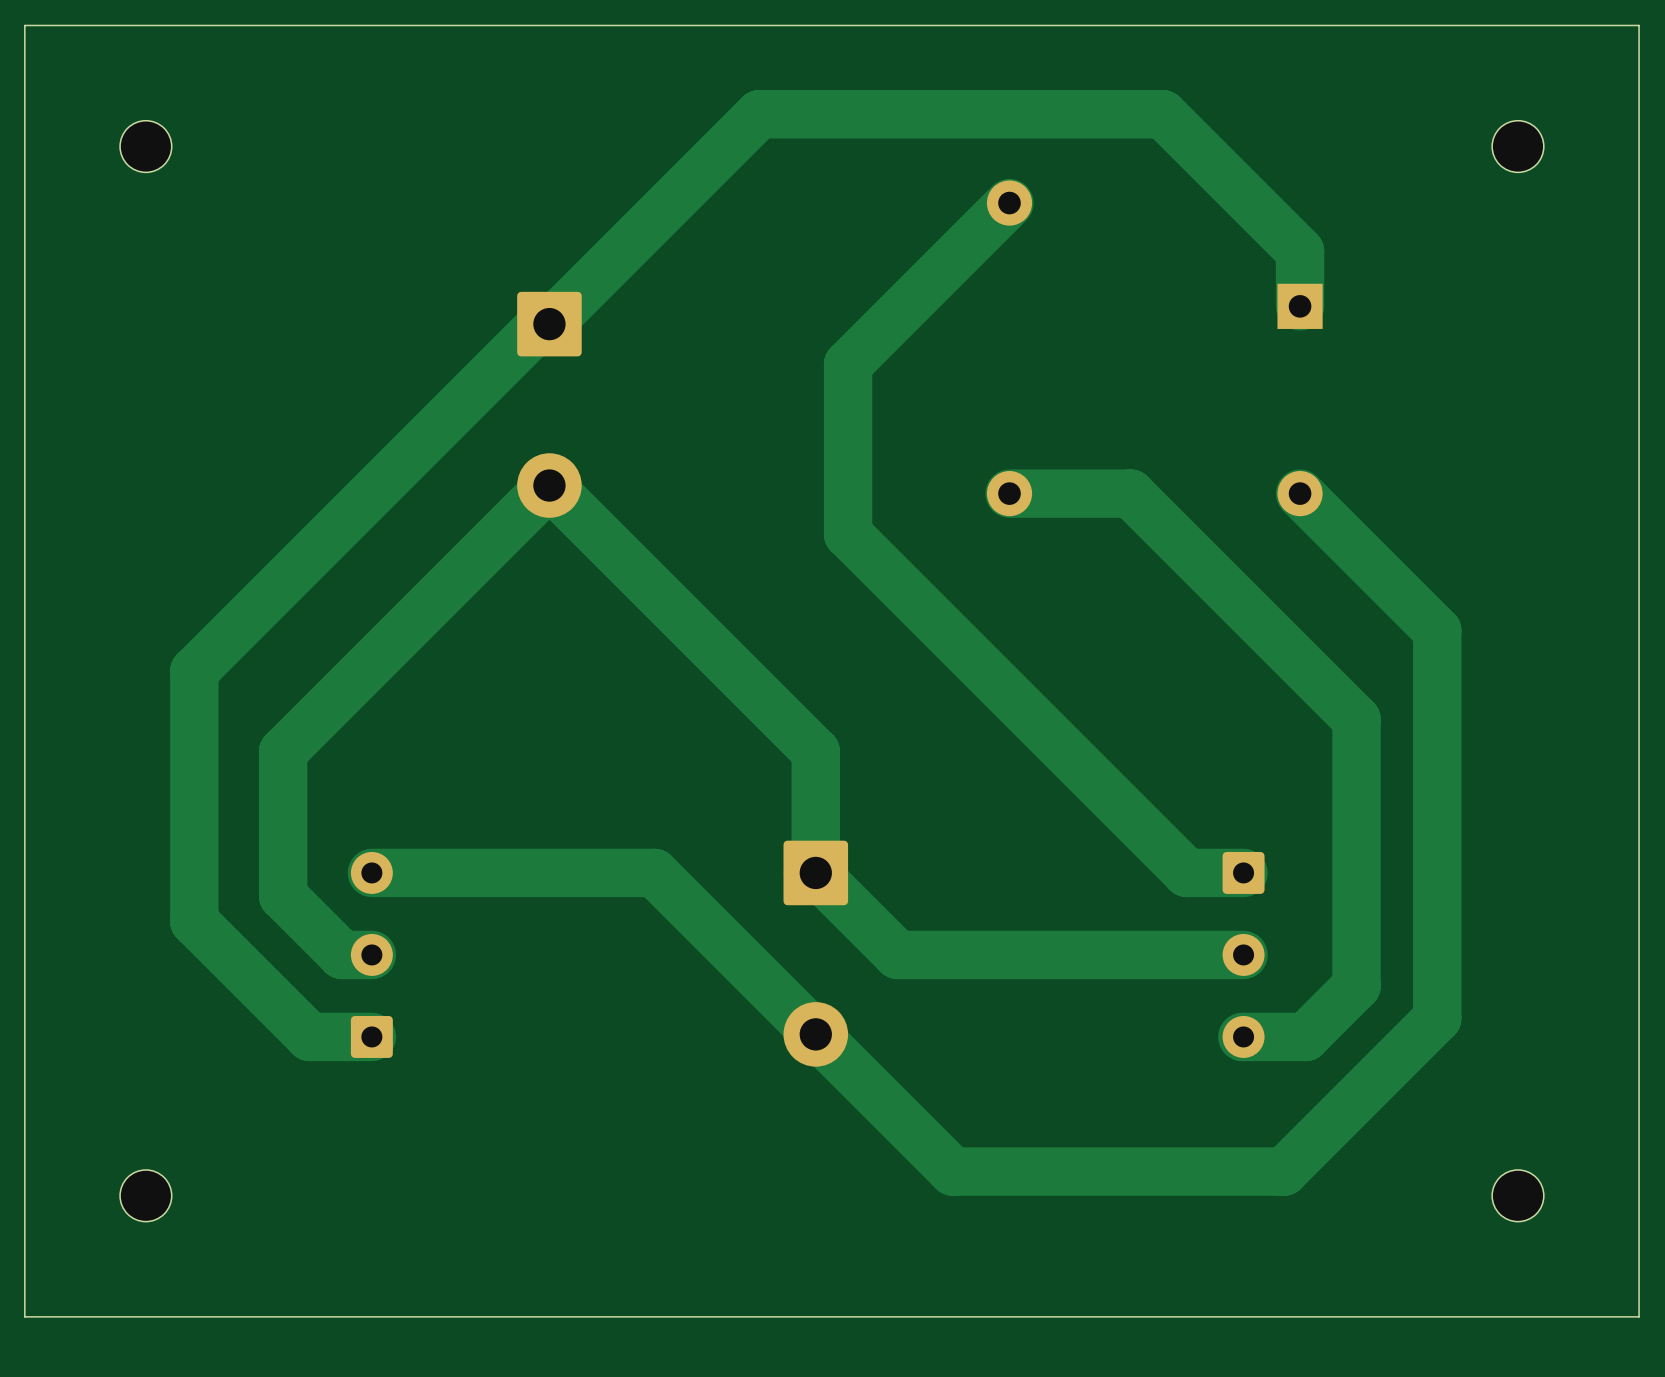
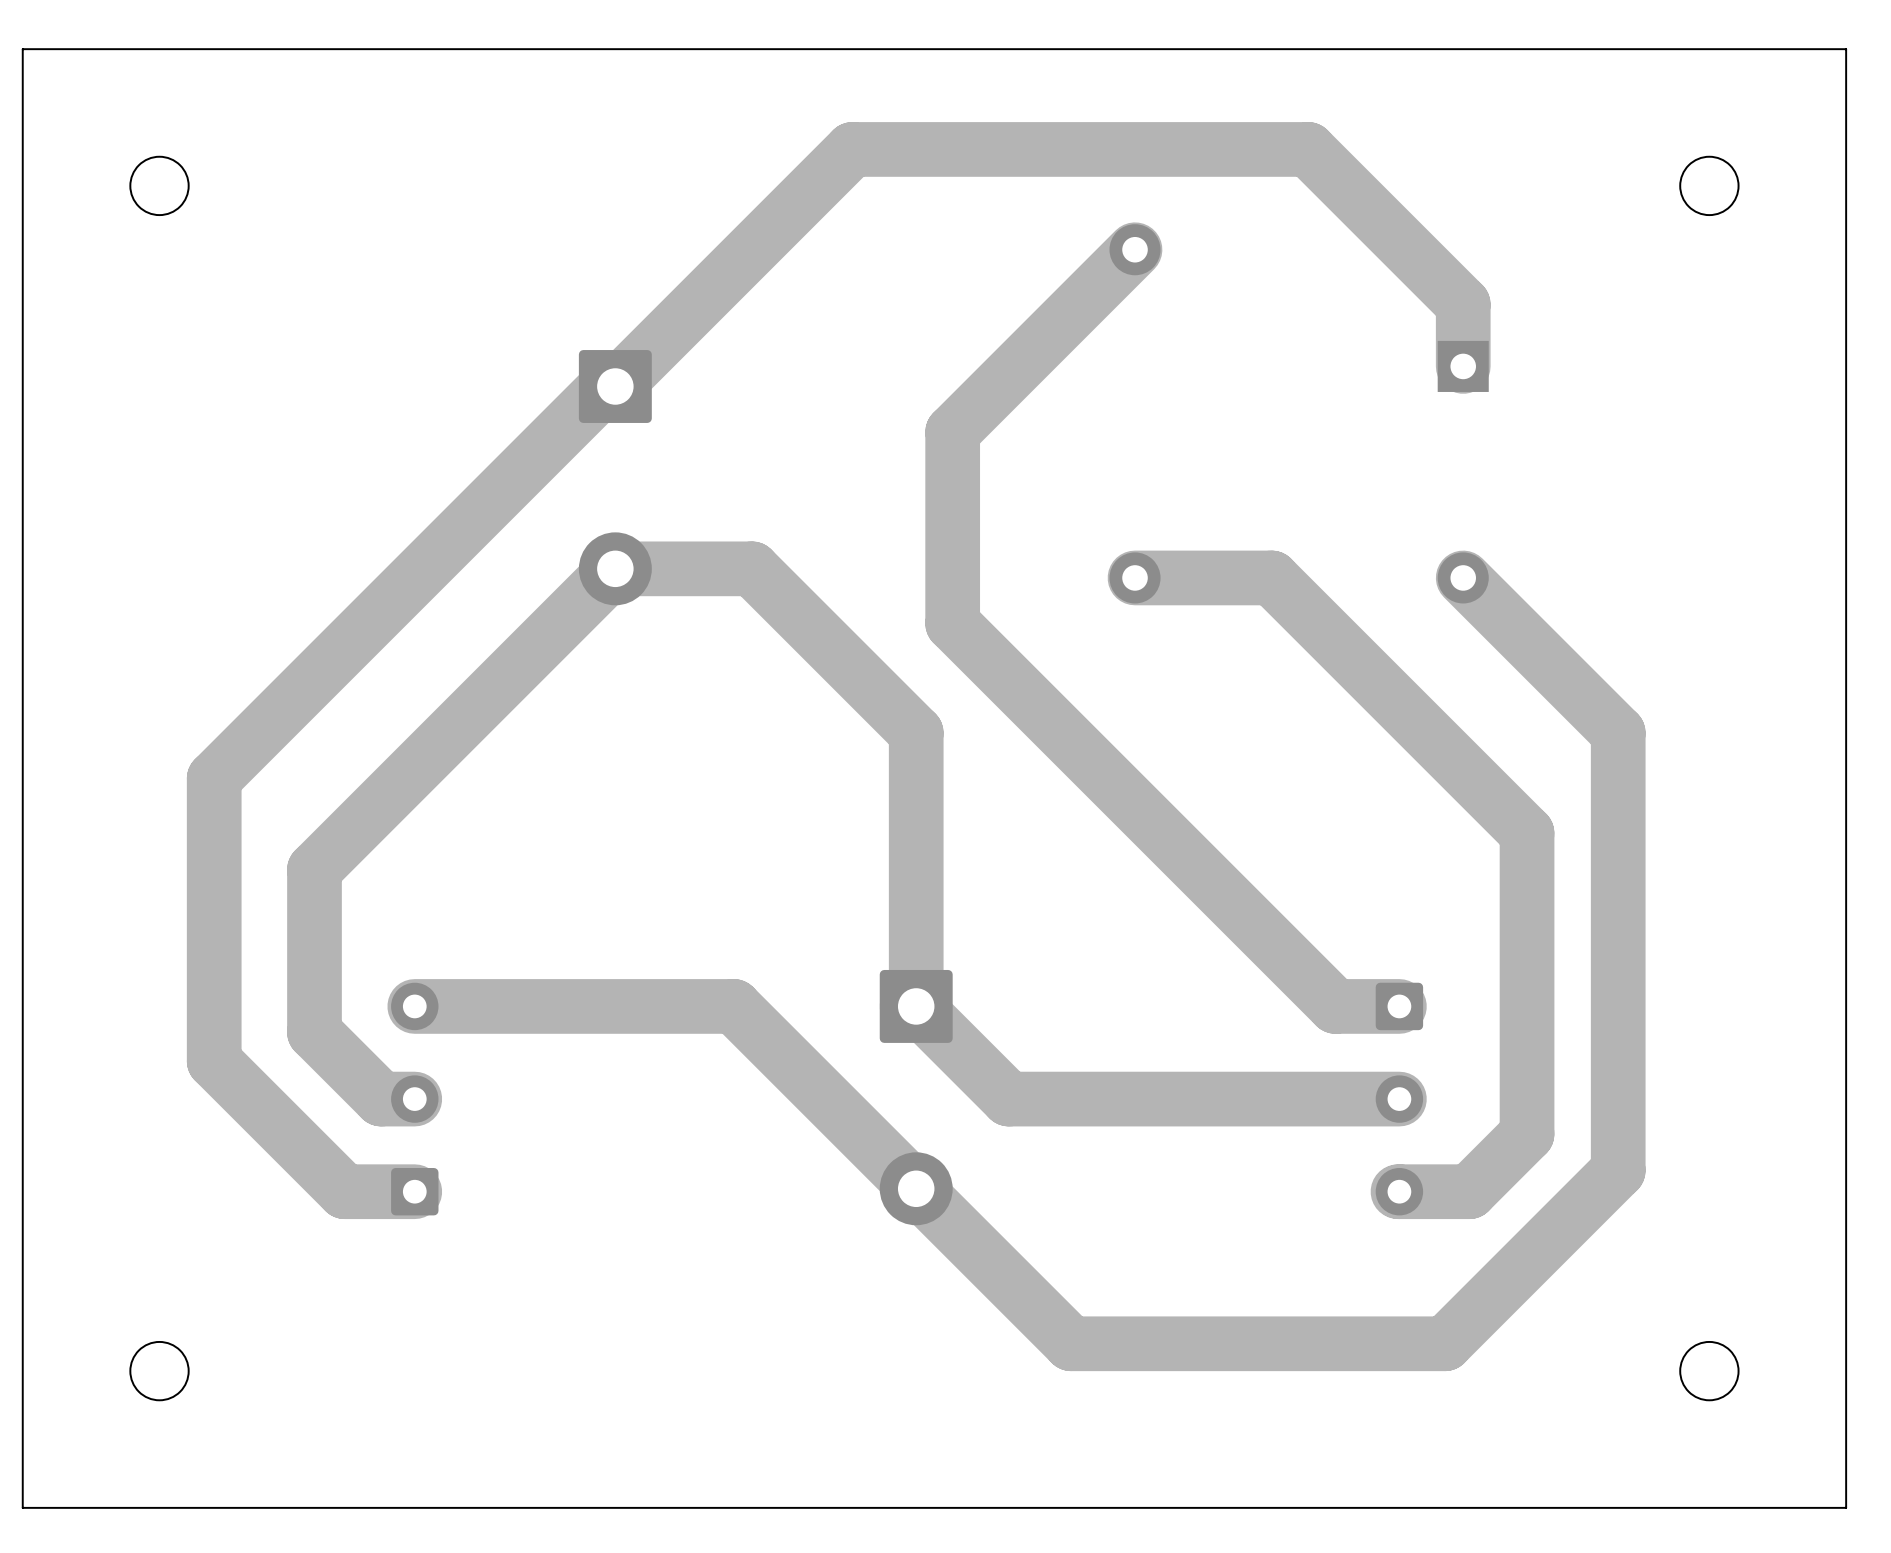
track: (549, 485) (815, 751) -> (615, 568) (752, 568) (916, 732) (916, 869)

